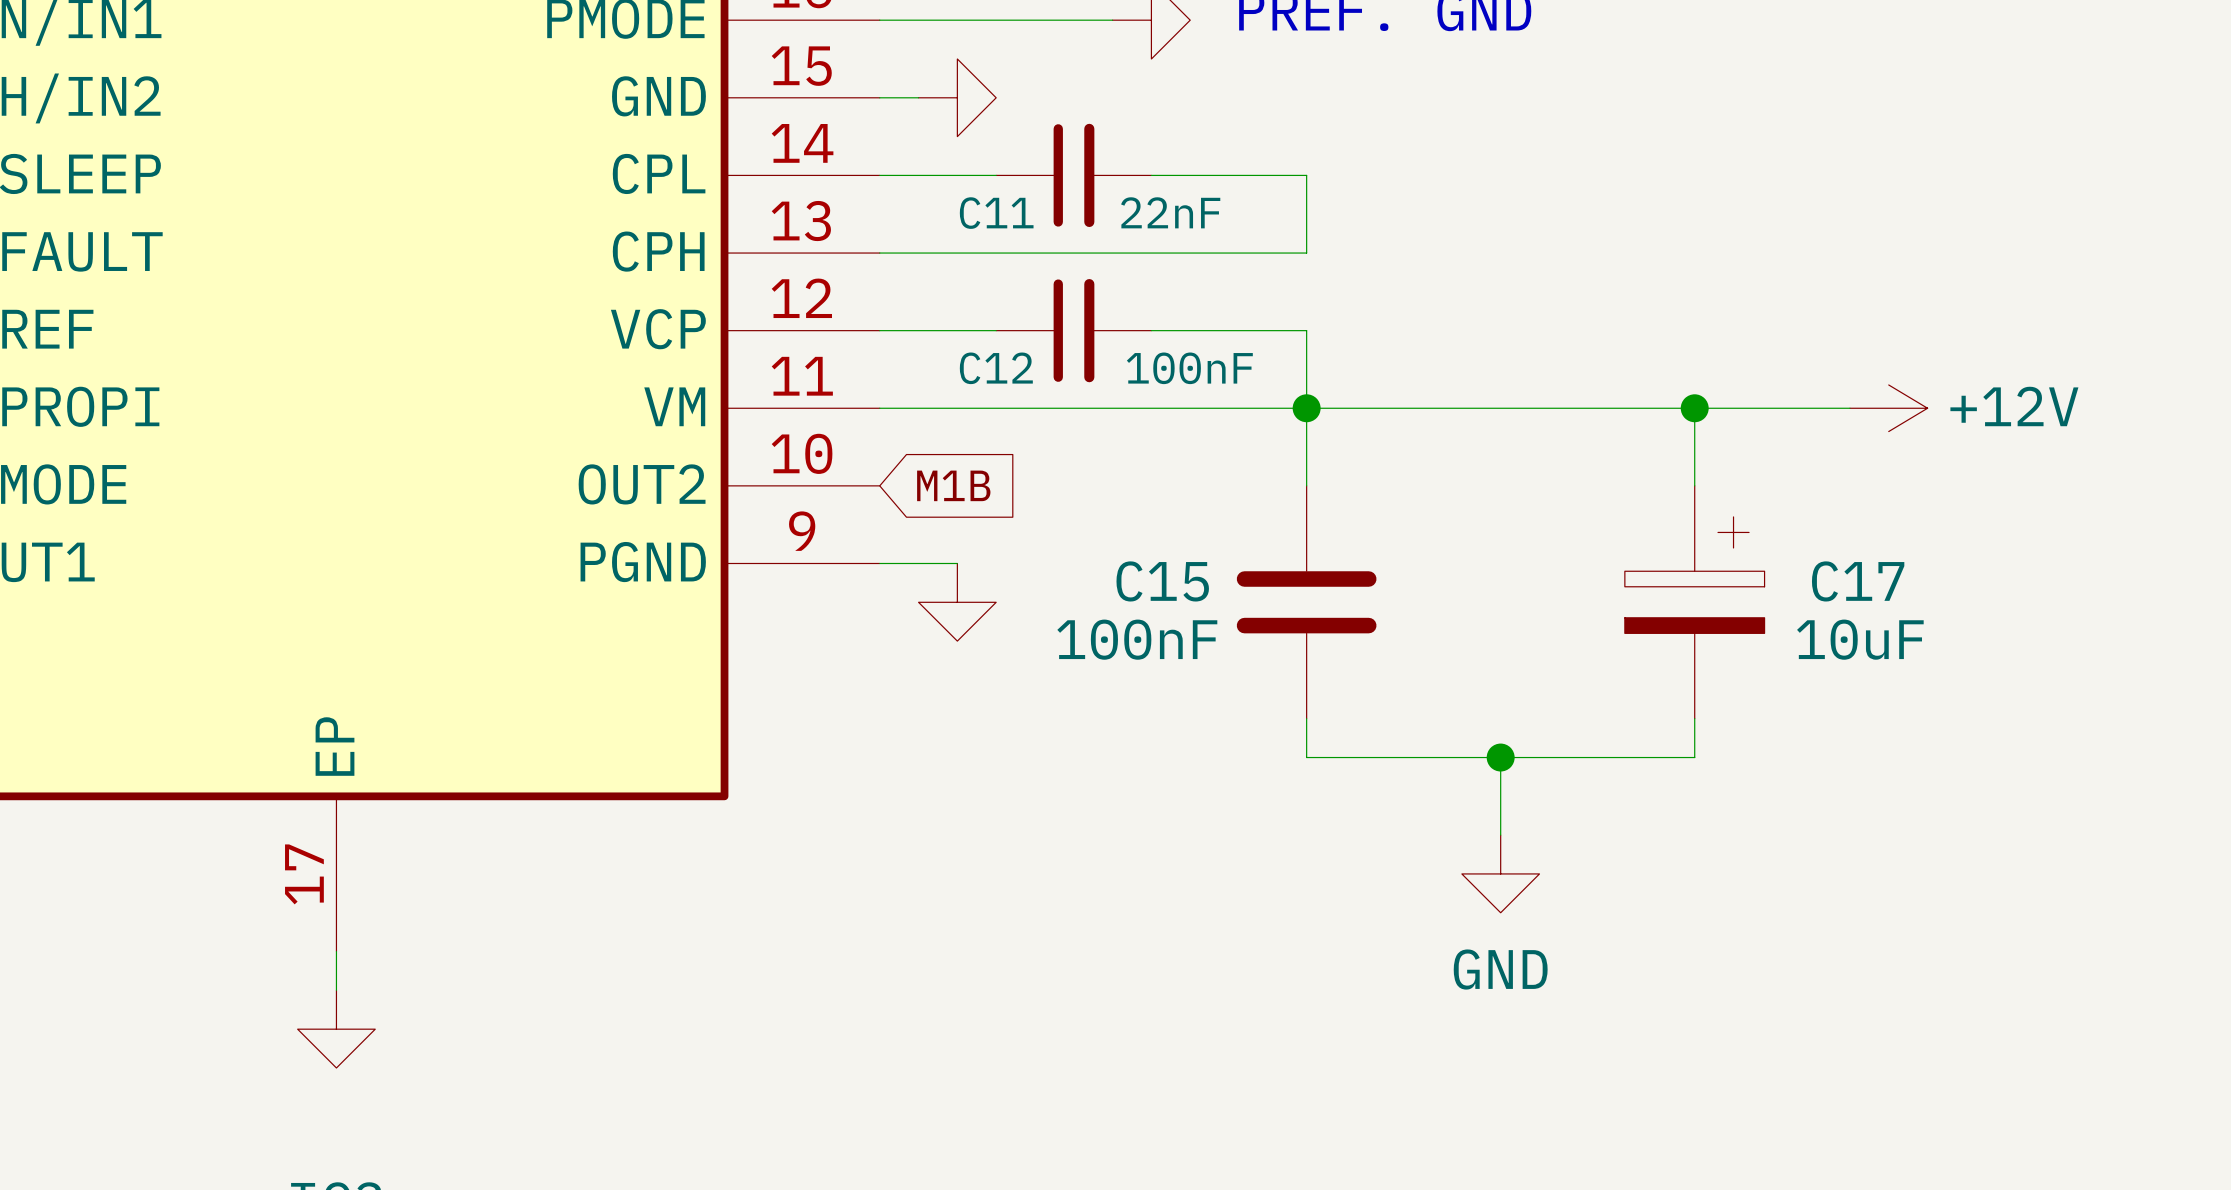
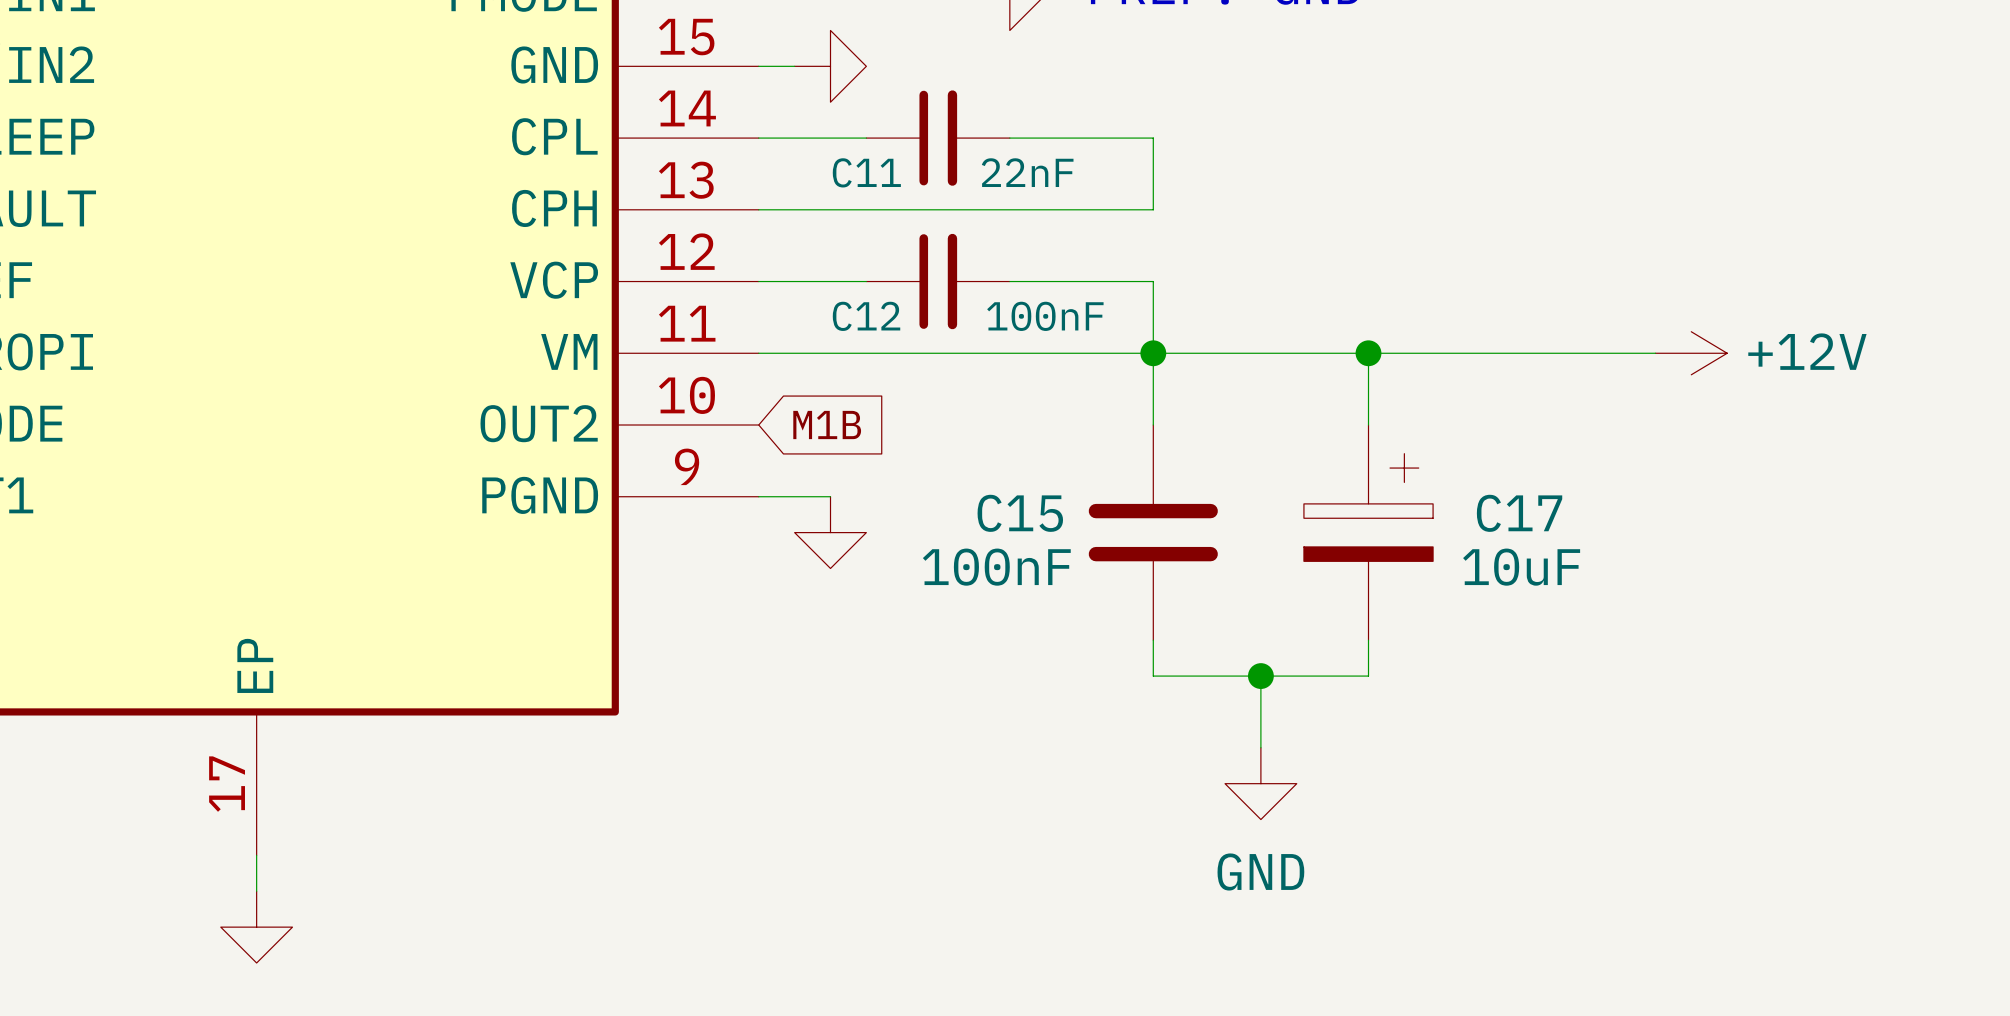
wire: (1694, 408) (1694, 485) -> (1368, 353) (1368, 425)
junction position: (1694, 408) -> (1368, 353)
C17 position: (1694, 602) -> (1368, 532)
wire: (1694, 718) (1694, 757) (1539, 757) -> (1368, 640) (1368, 676)
wire: (1500, 757) (1500, 835) -> (1260, 676) (1260, 747)
junction position: (1500, 757) -> (1260, 676)
power symbol position: GND (1500, 873) -> GND (1260, 783)

